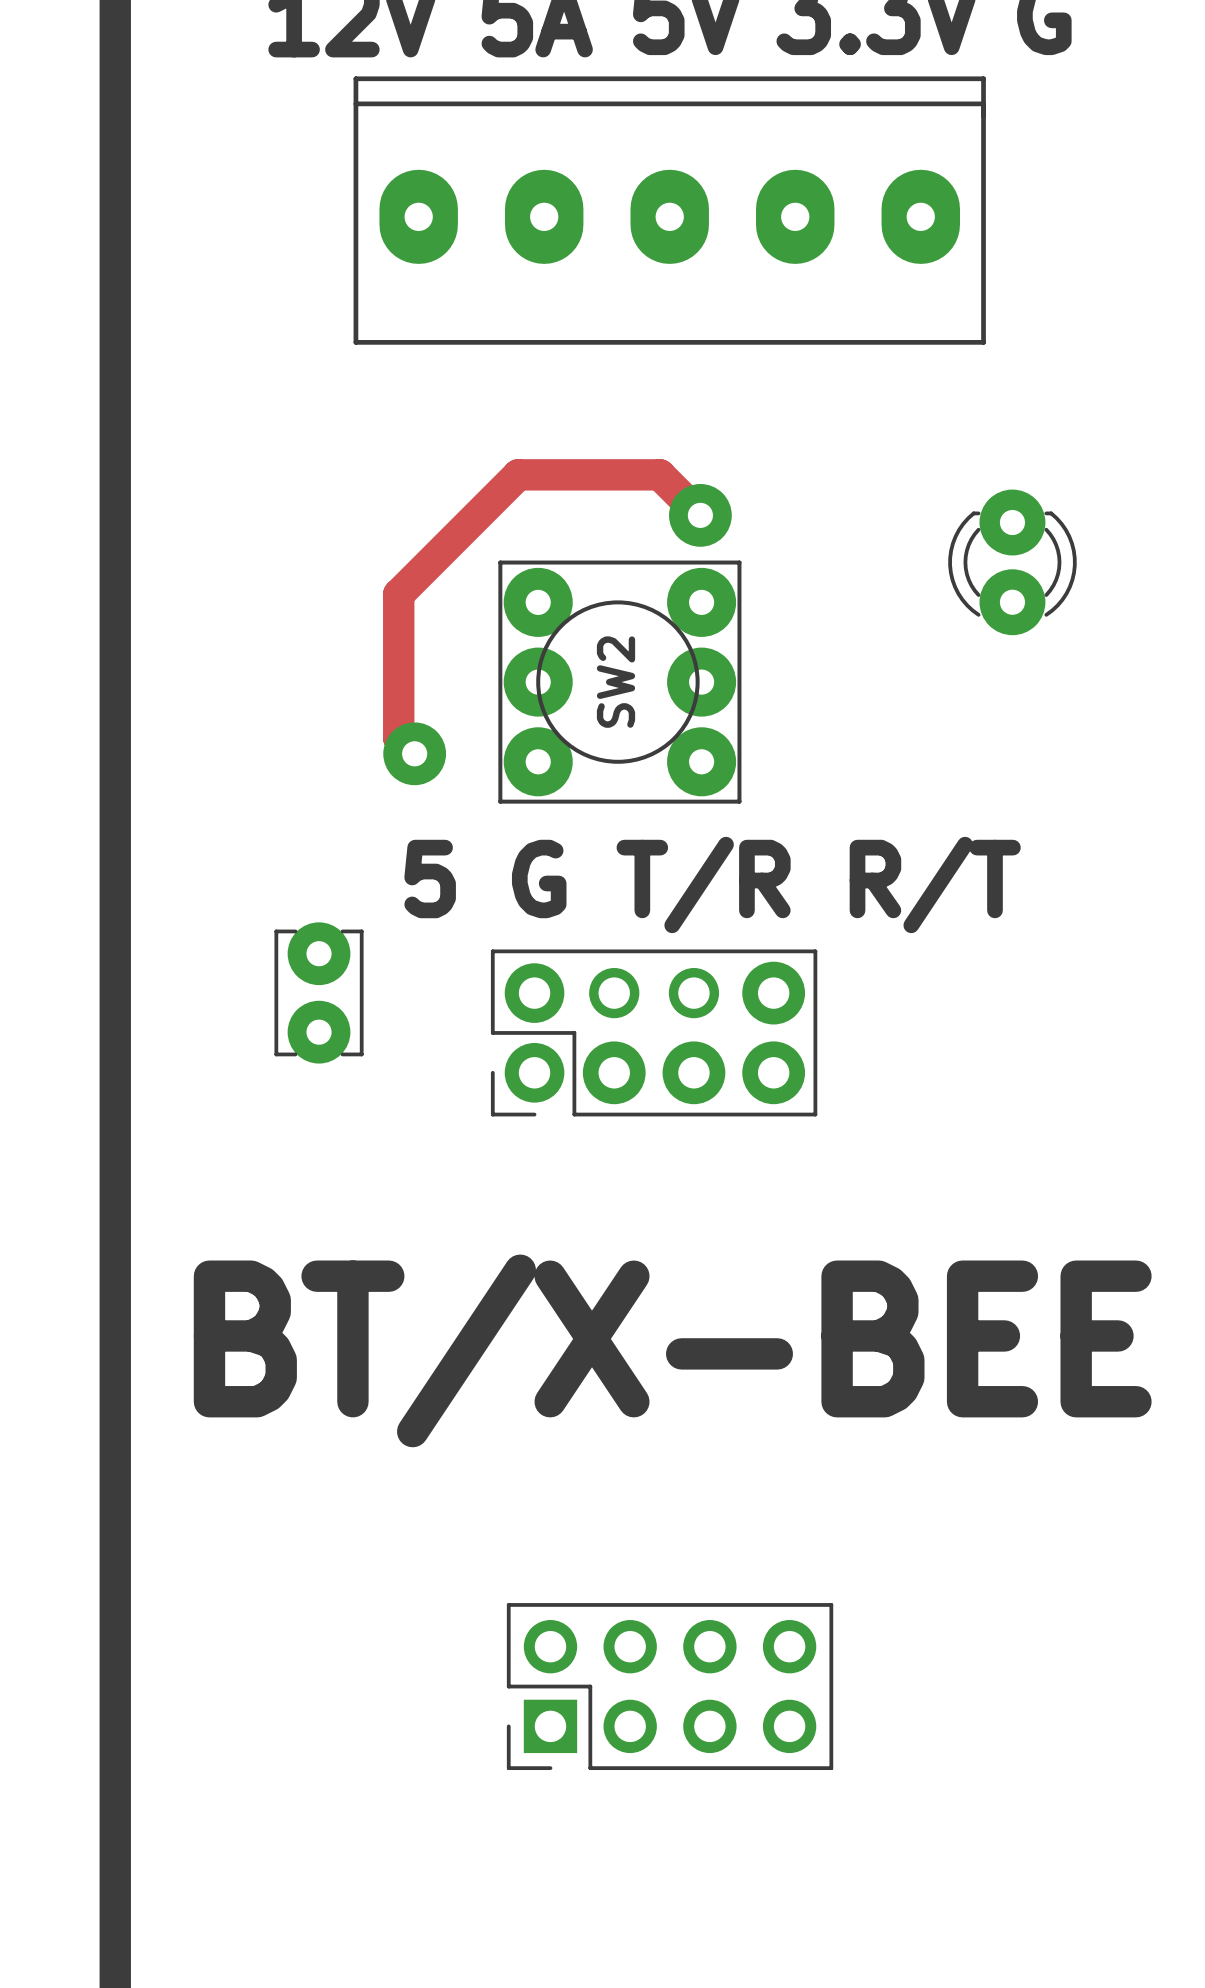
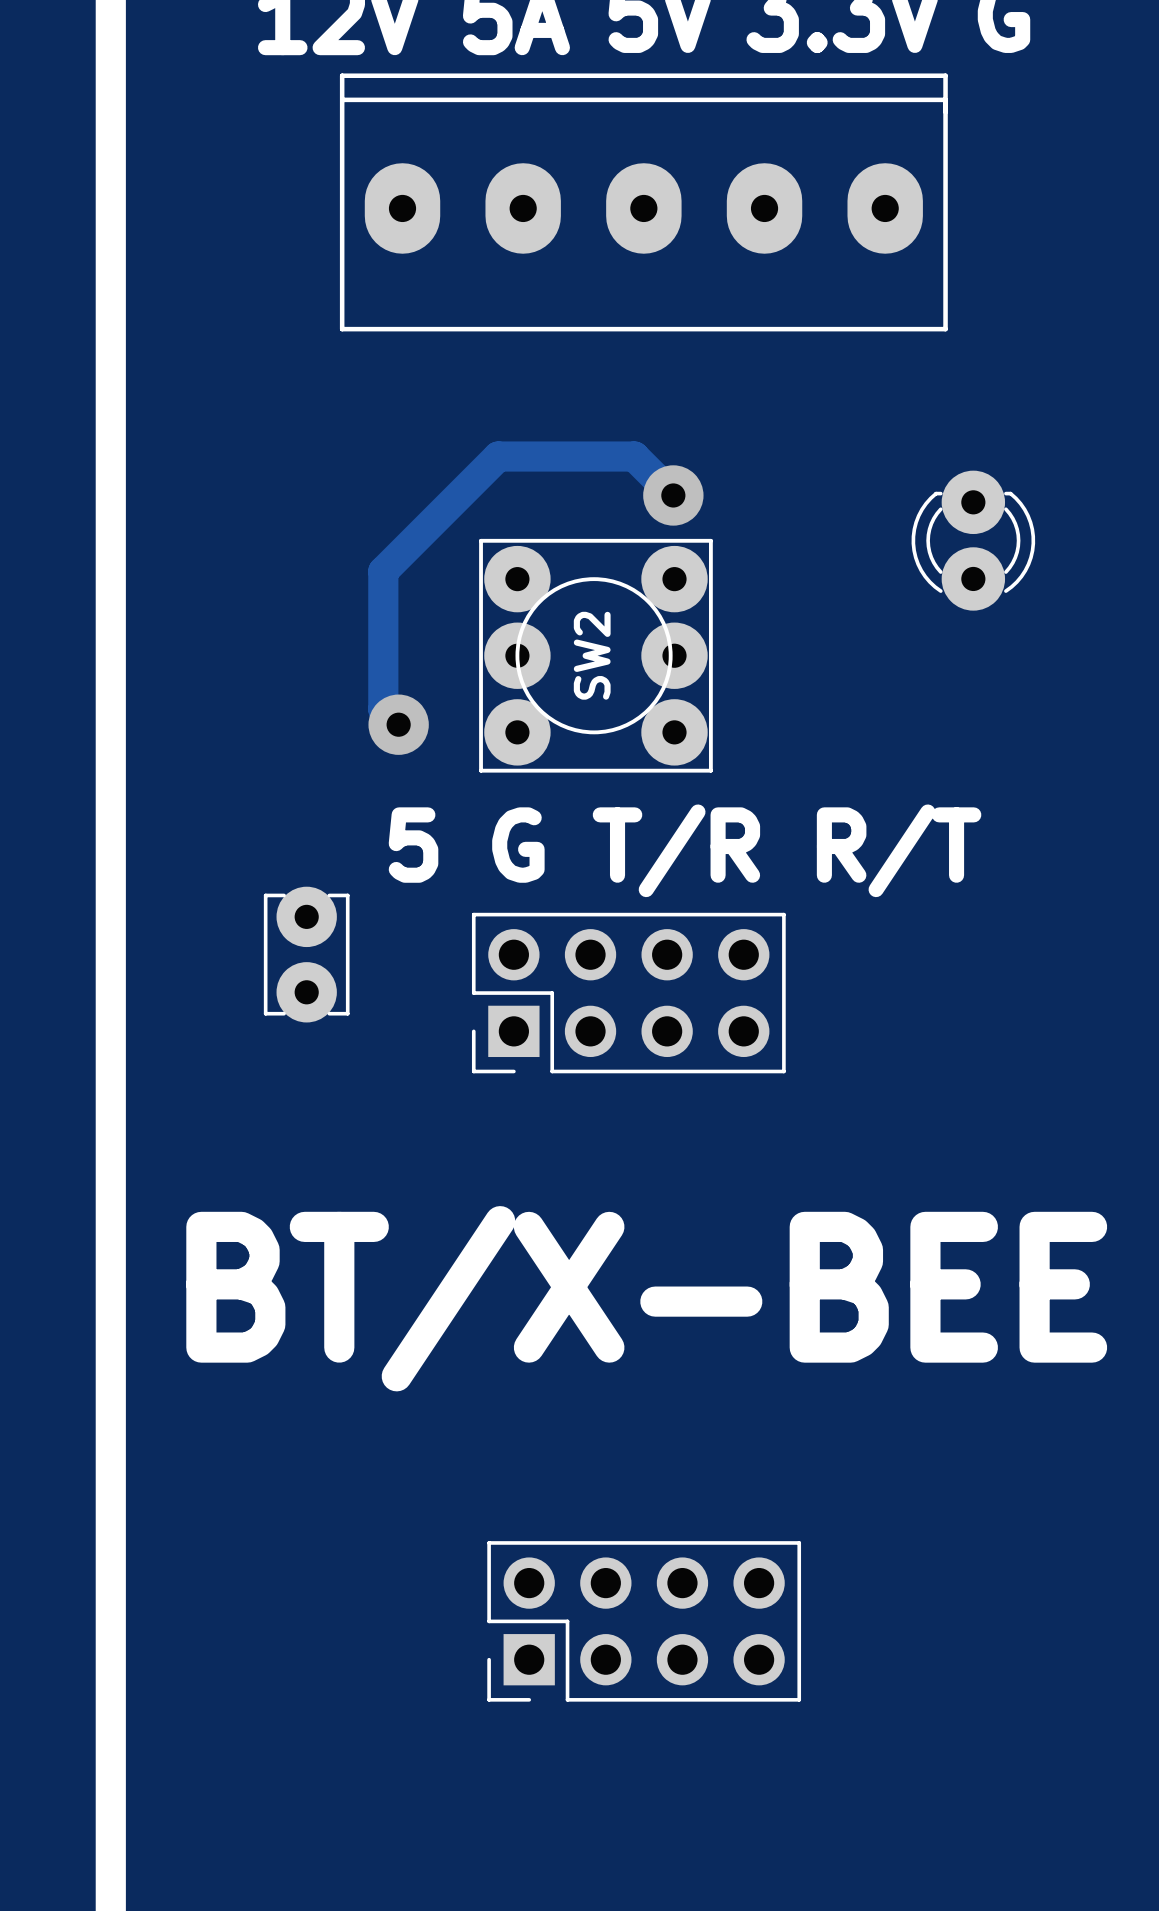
part footprint: [490, 949, 818, 1117] -> [471, 912, 786, 1074]

